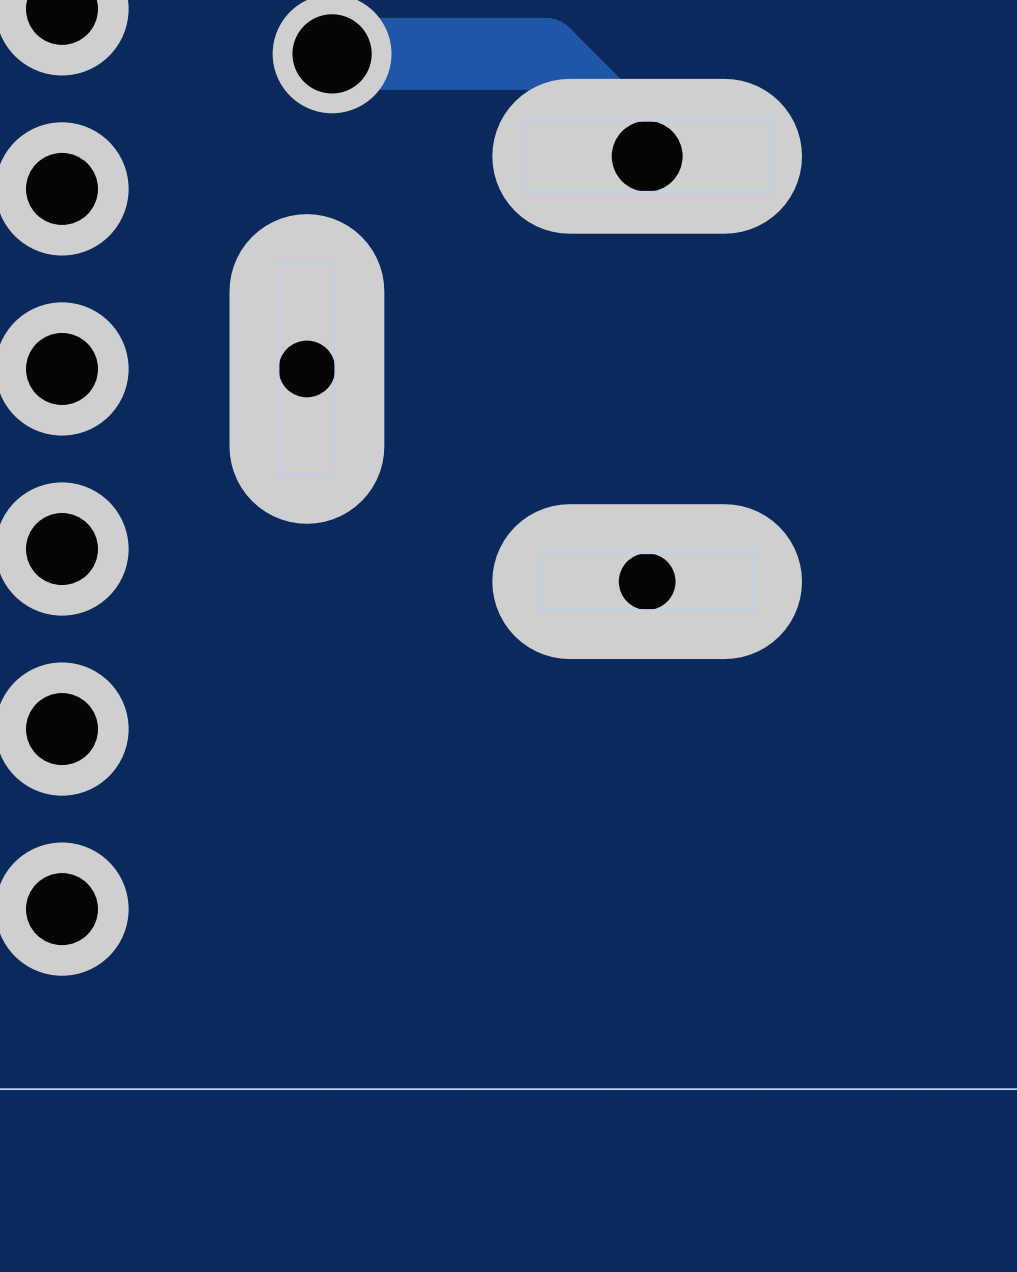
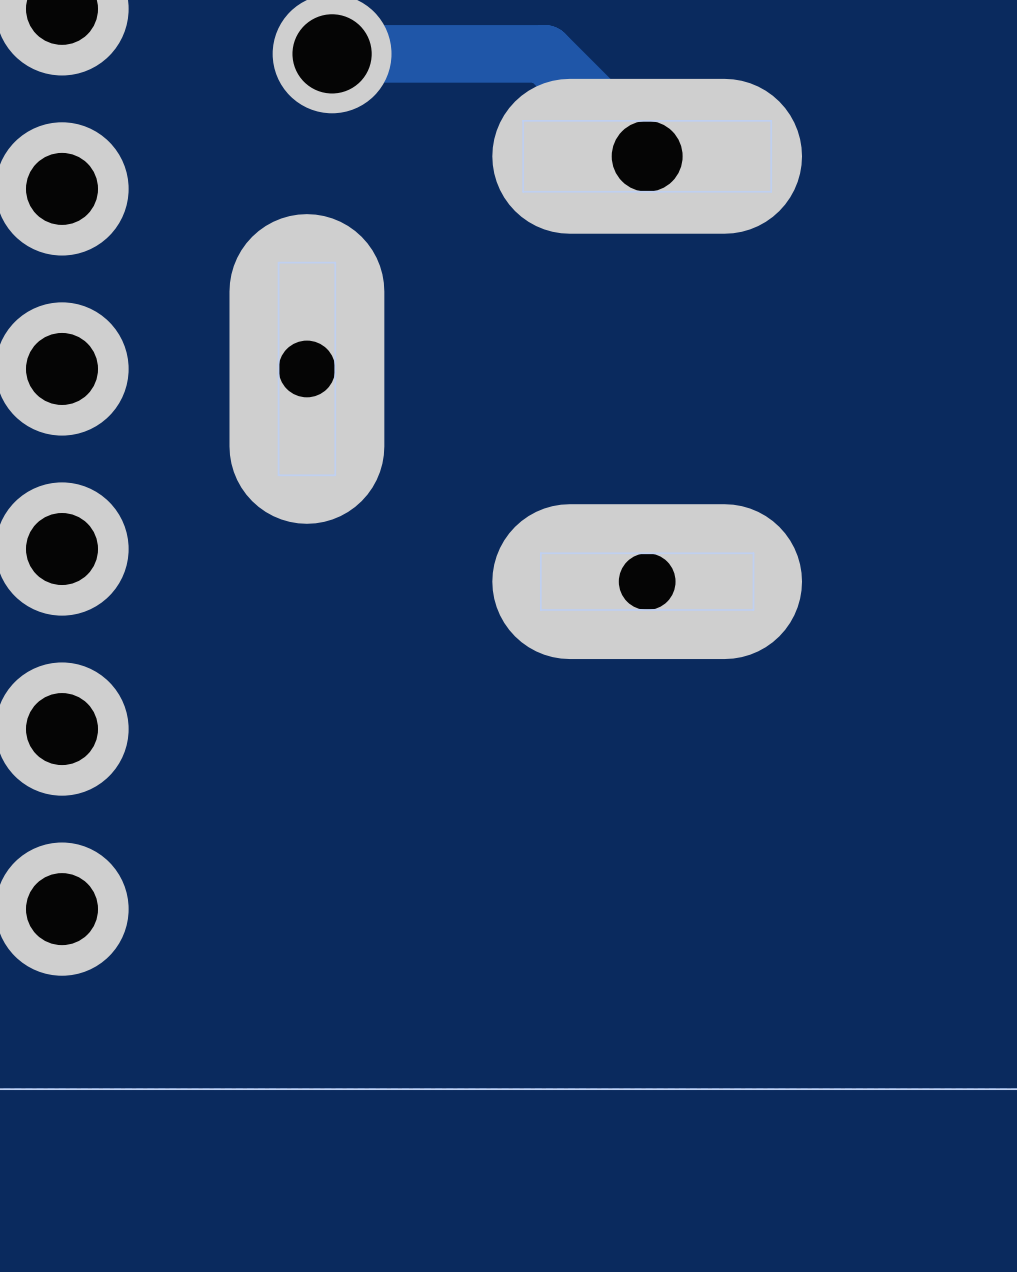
track width: thick (332, 53) (544, 53) (647, 156) -> thin (332, 53) (544, 53) (647, 156)

